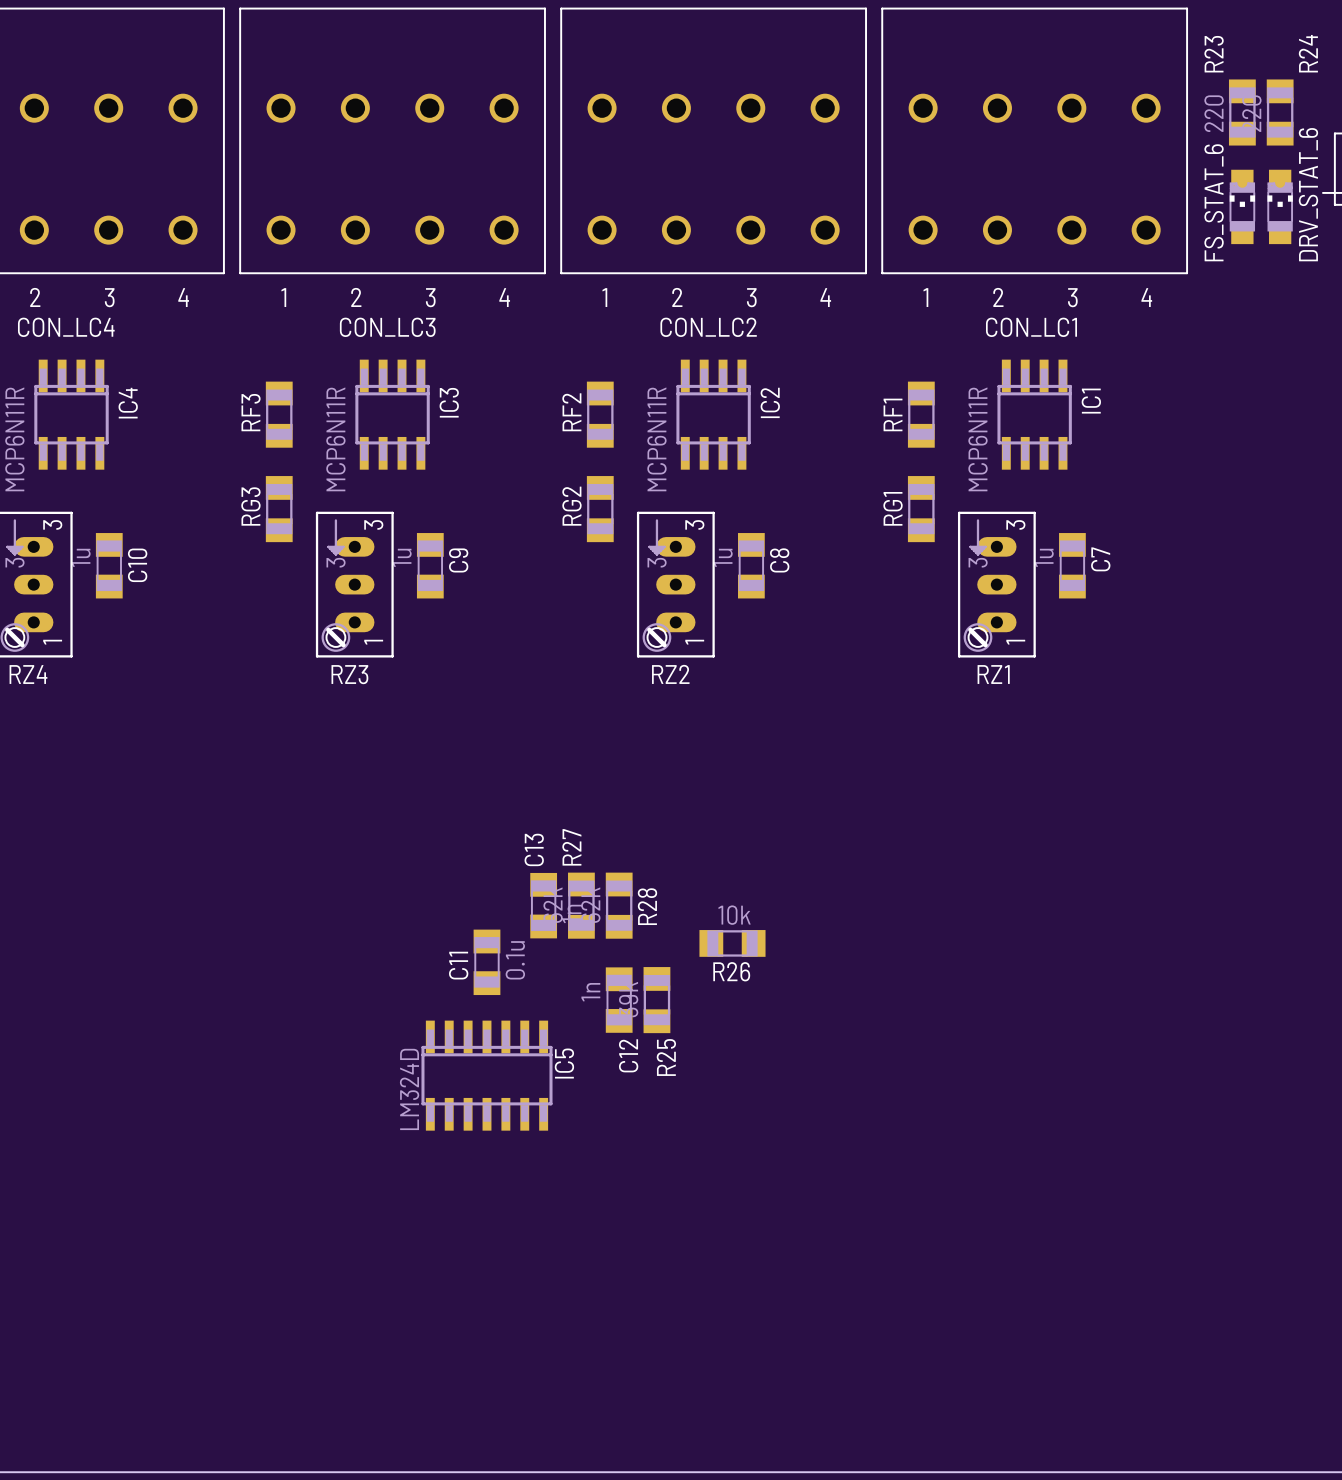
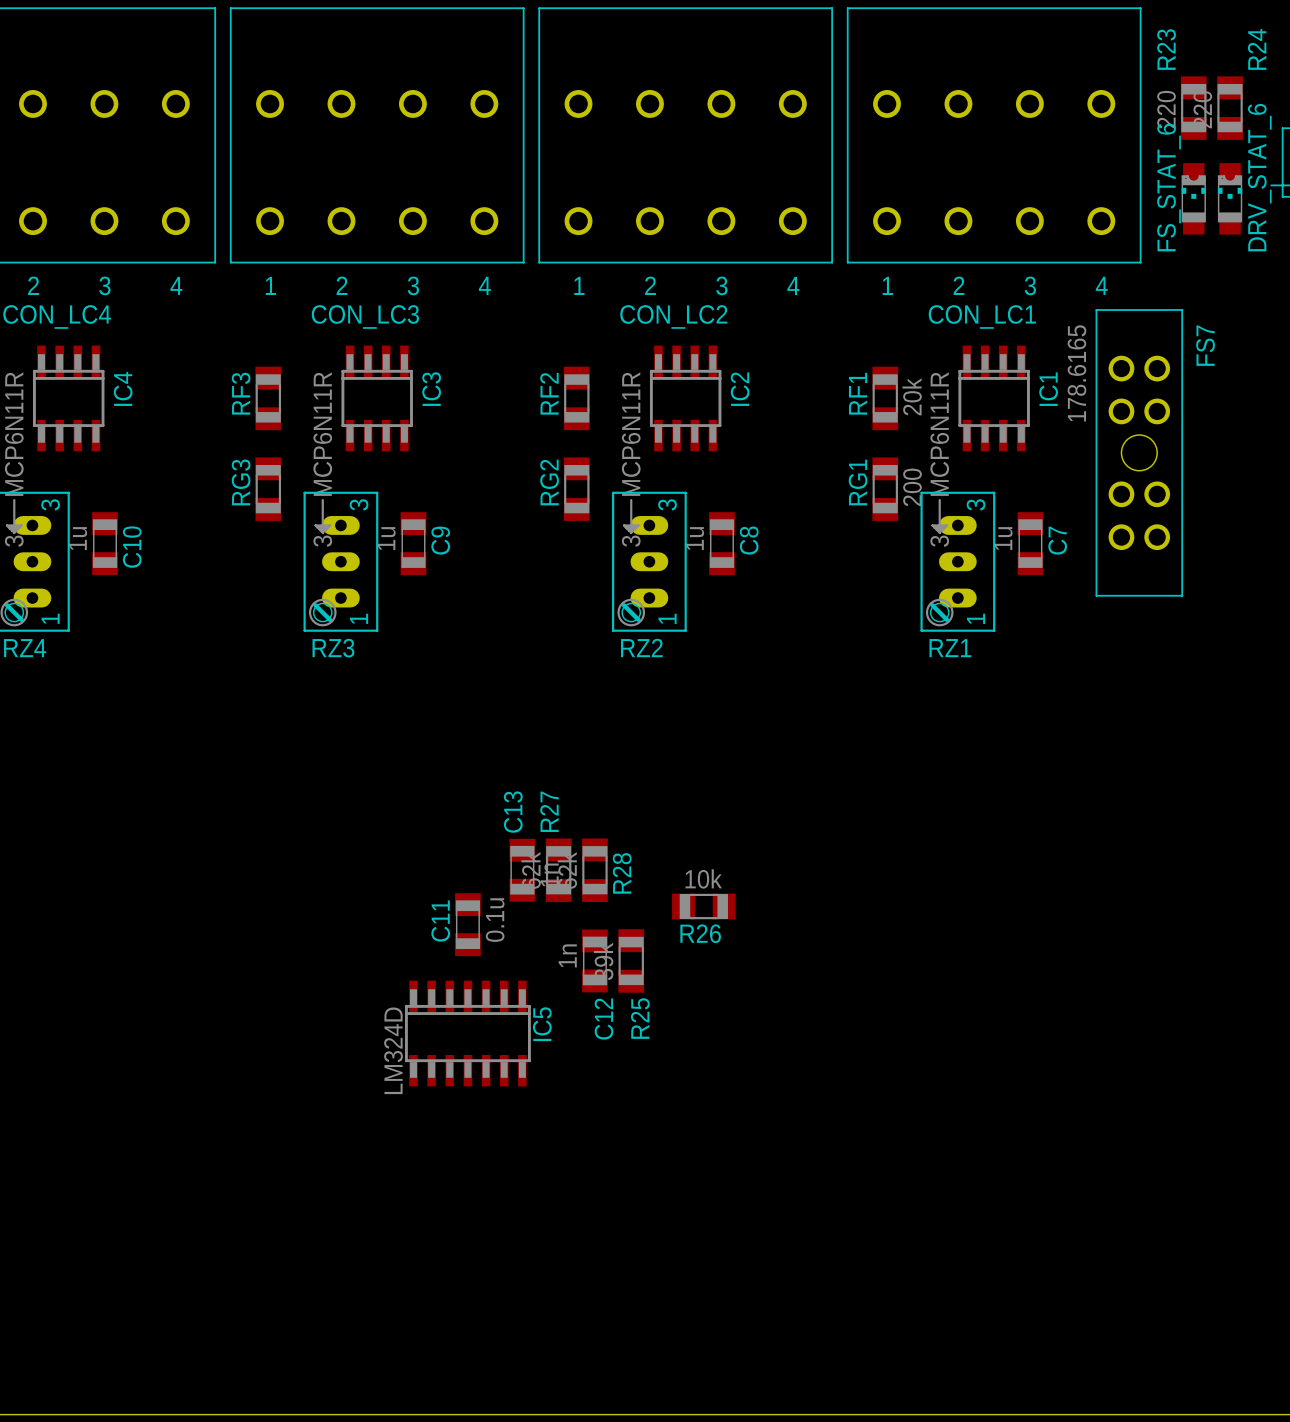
RF1 value: none -> 20k (912, 396)
FS7: none -> 178.6165 (1139, 452)
RG1 value: none -> 200 (912, 487)

